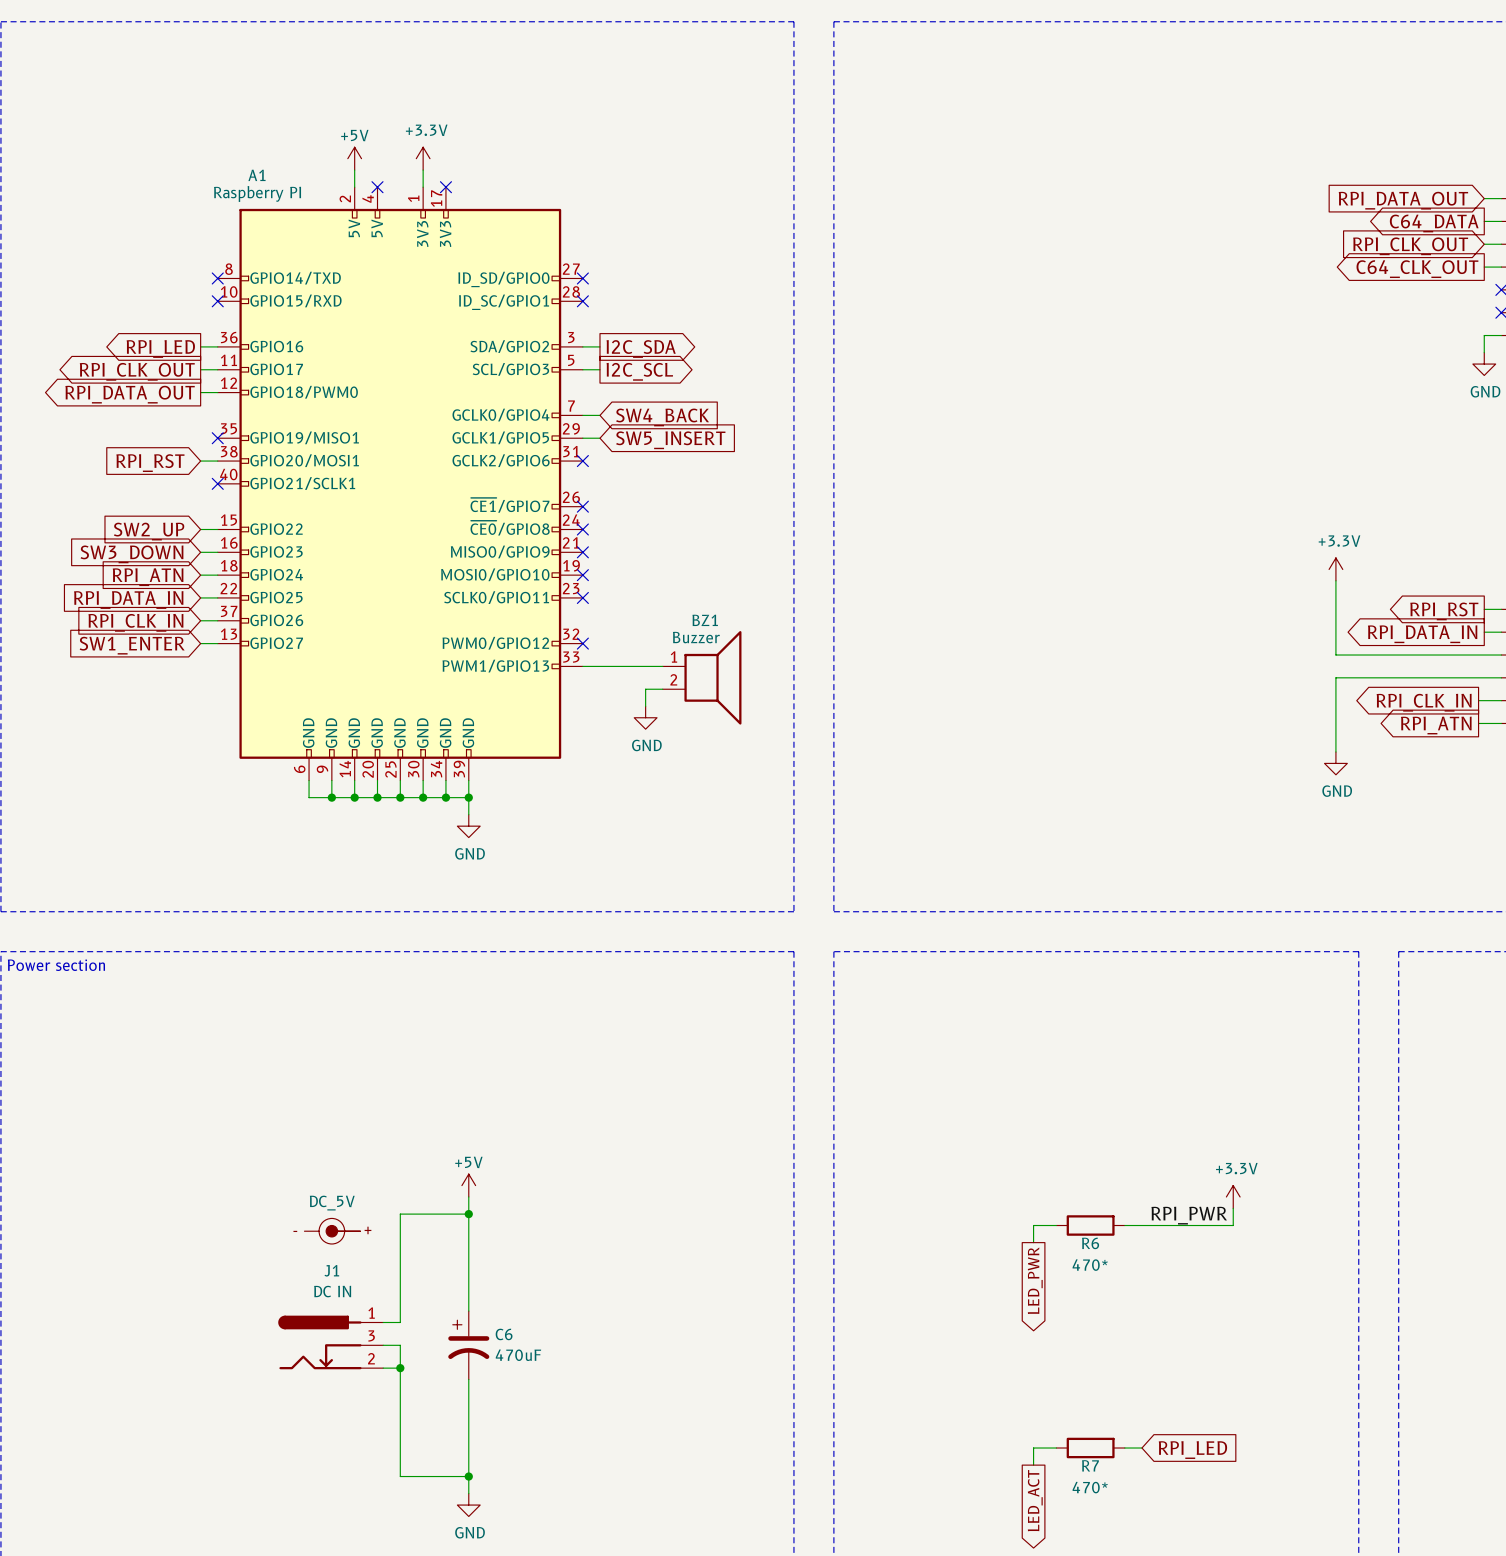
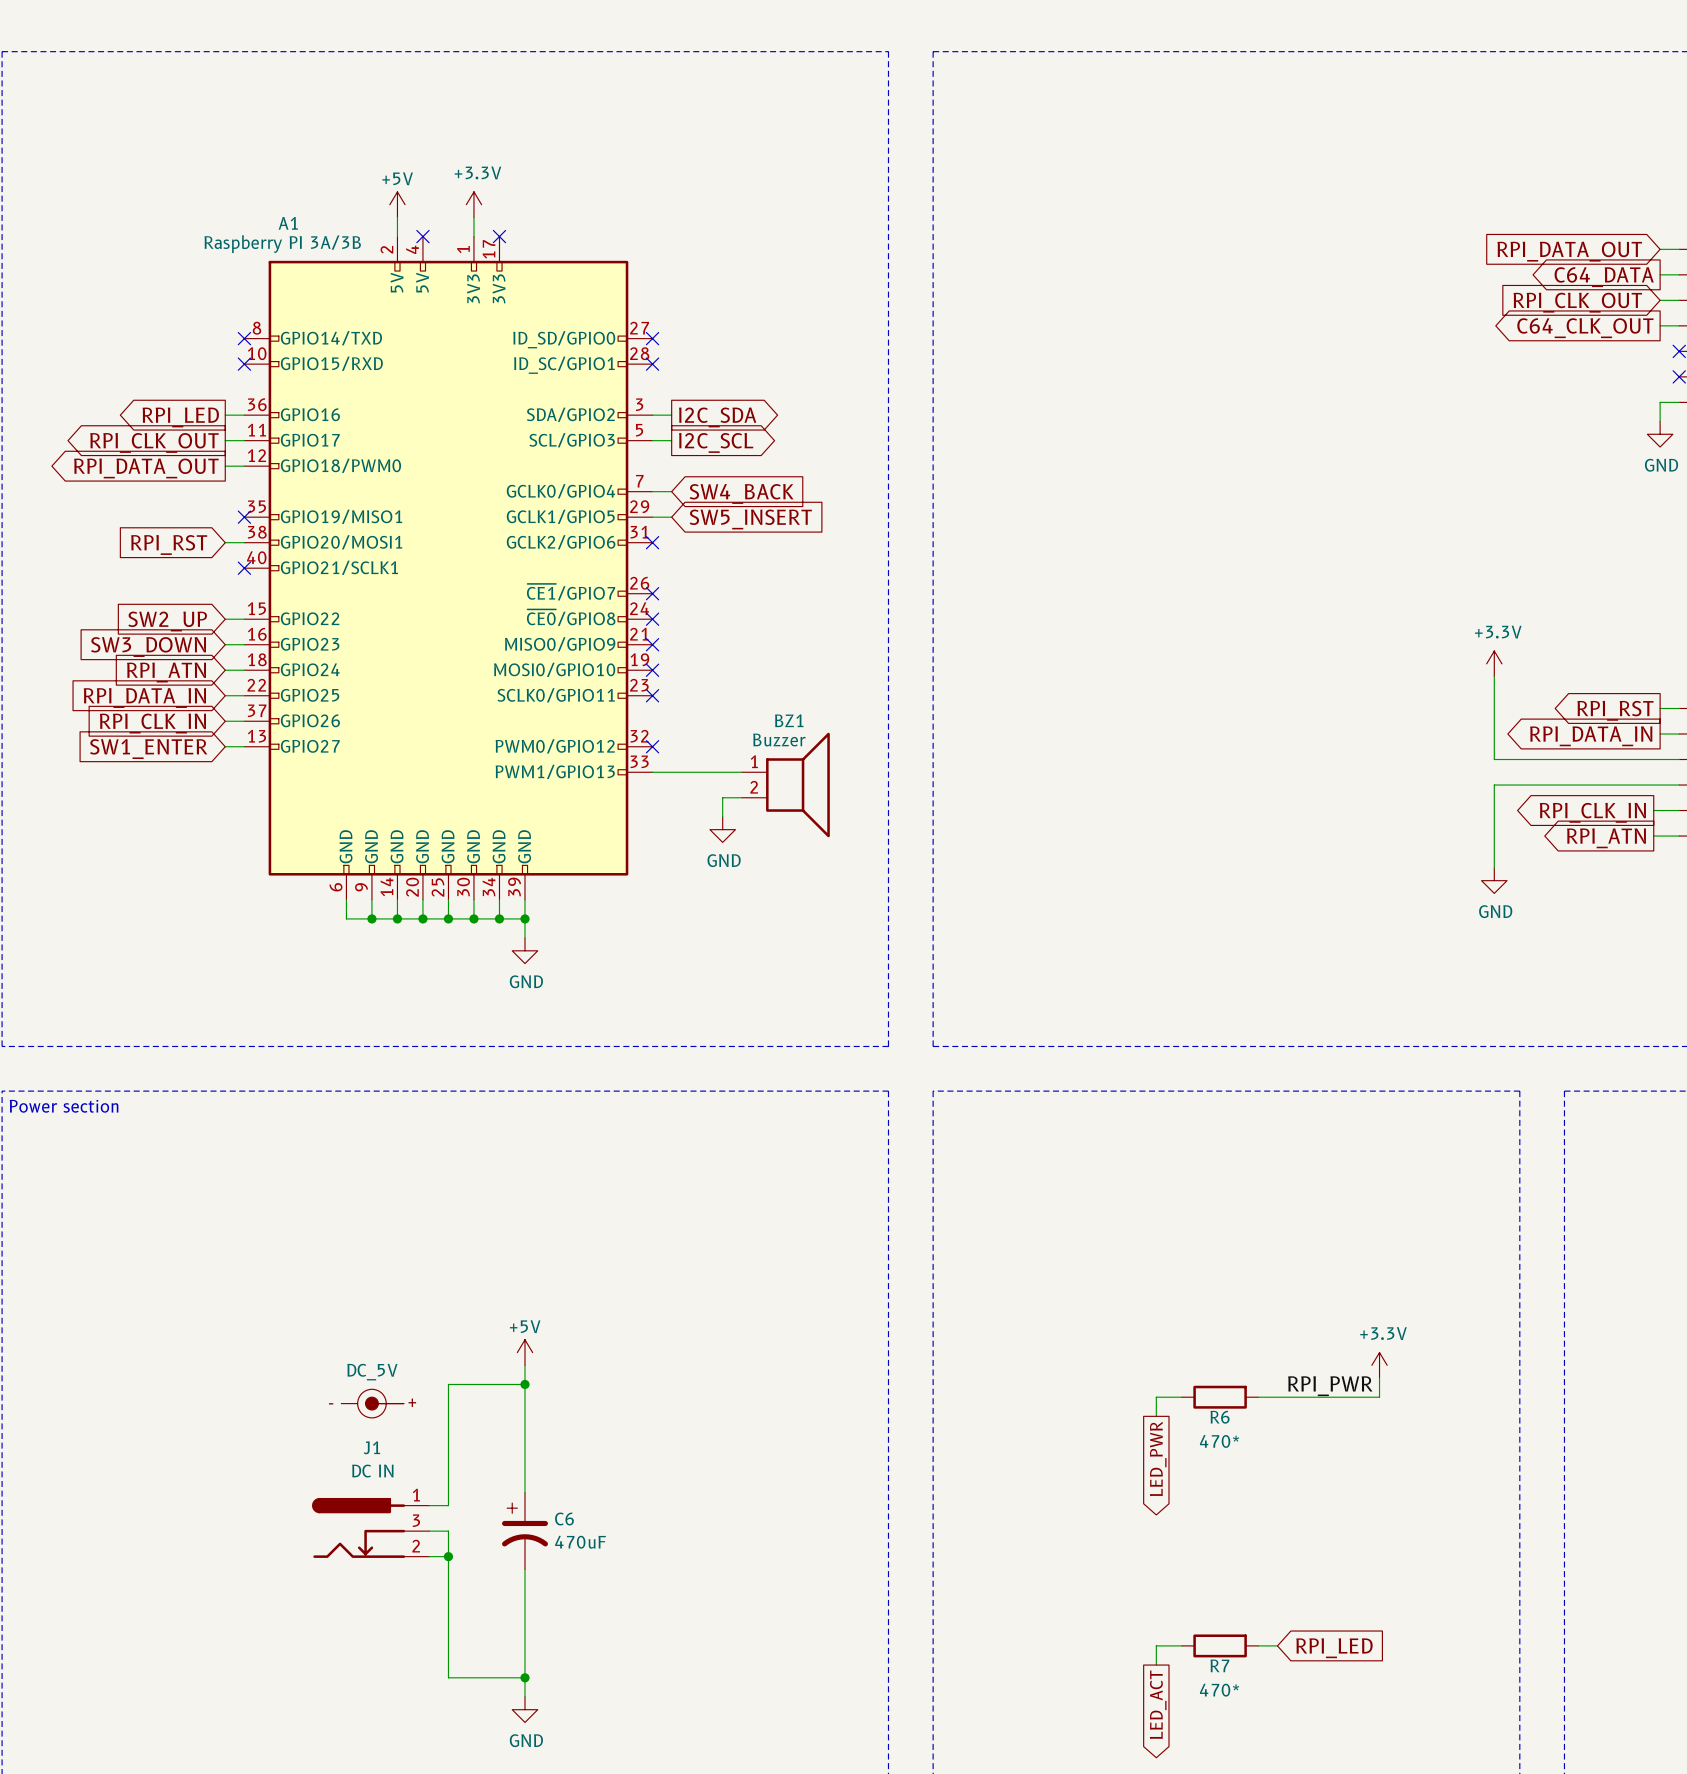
A1 value: Raspberry PI (257, 193) -> Raspberry PI 3A/3B (282, 244)

